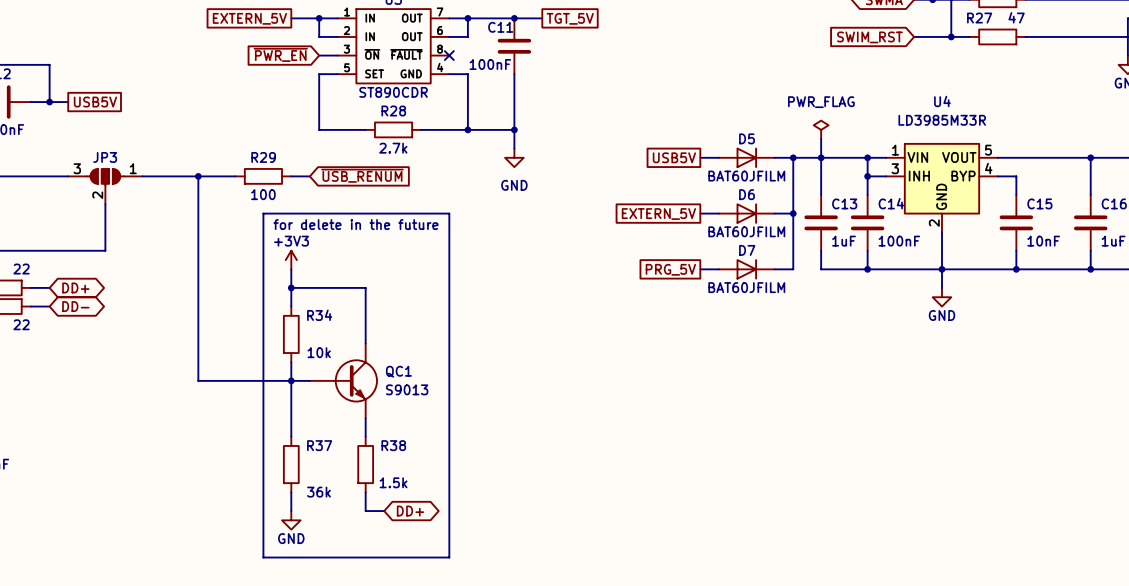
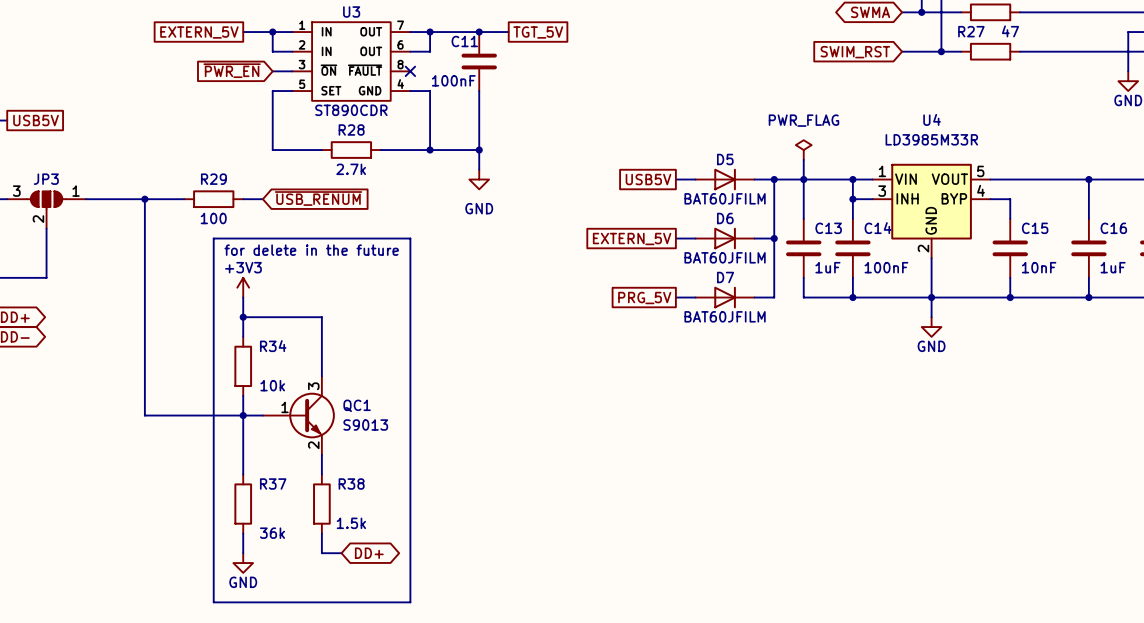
QC1 pin number: none -> 3 (313, 386)
QC1 pin number: none -> 1 (285, 407)
QC1 pin number: none -> 2 (313, 445)

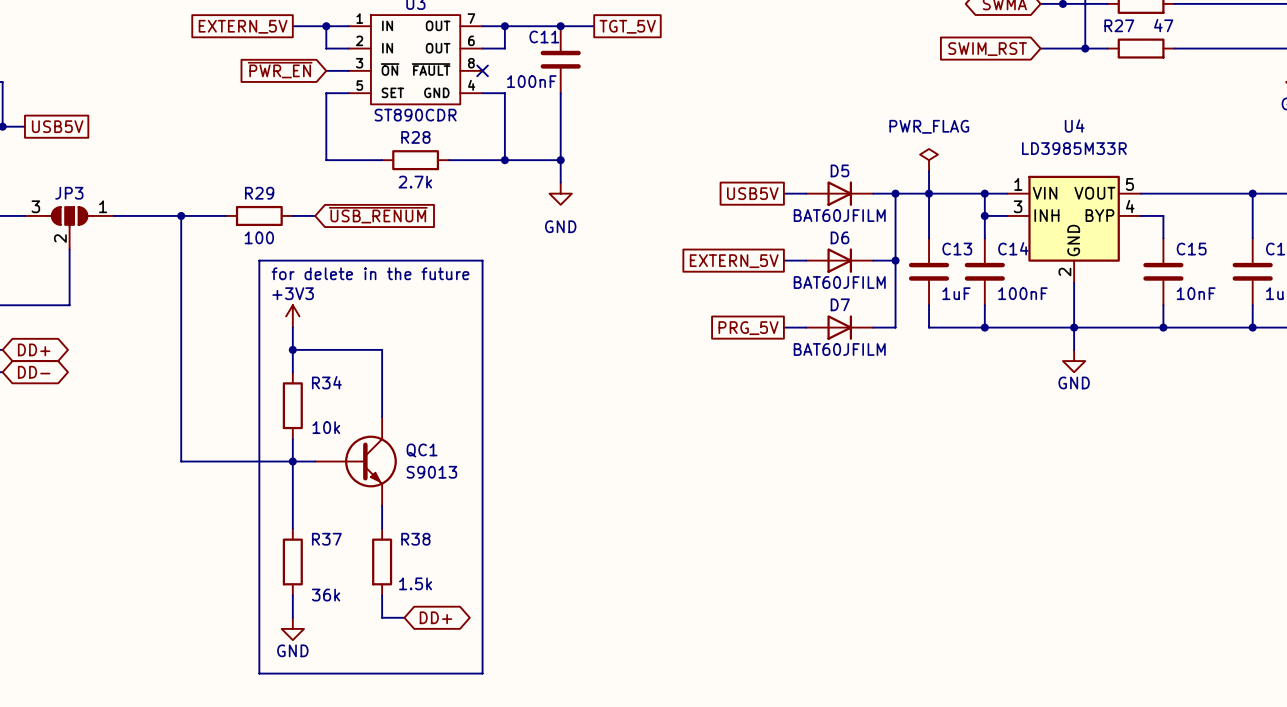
QC1 pin number: 3 (313, 386) -> none
QC1 pin number: 1 (285, 407) -> none
QC1 pin number: 2 (313, 445) -> none

